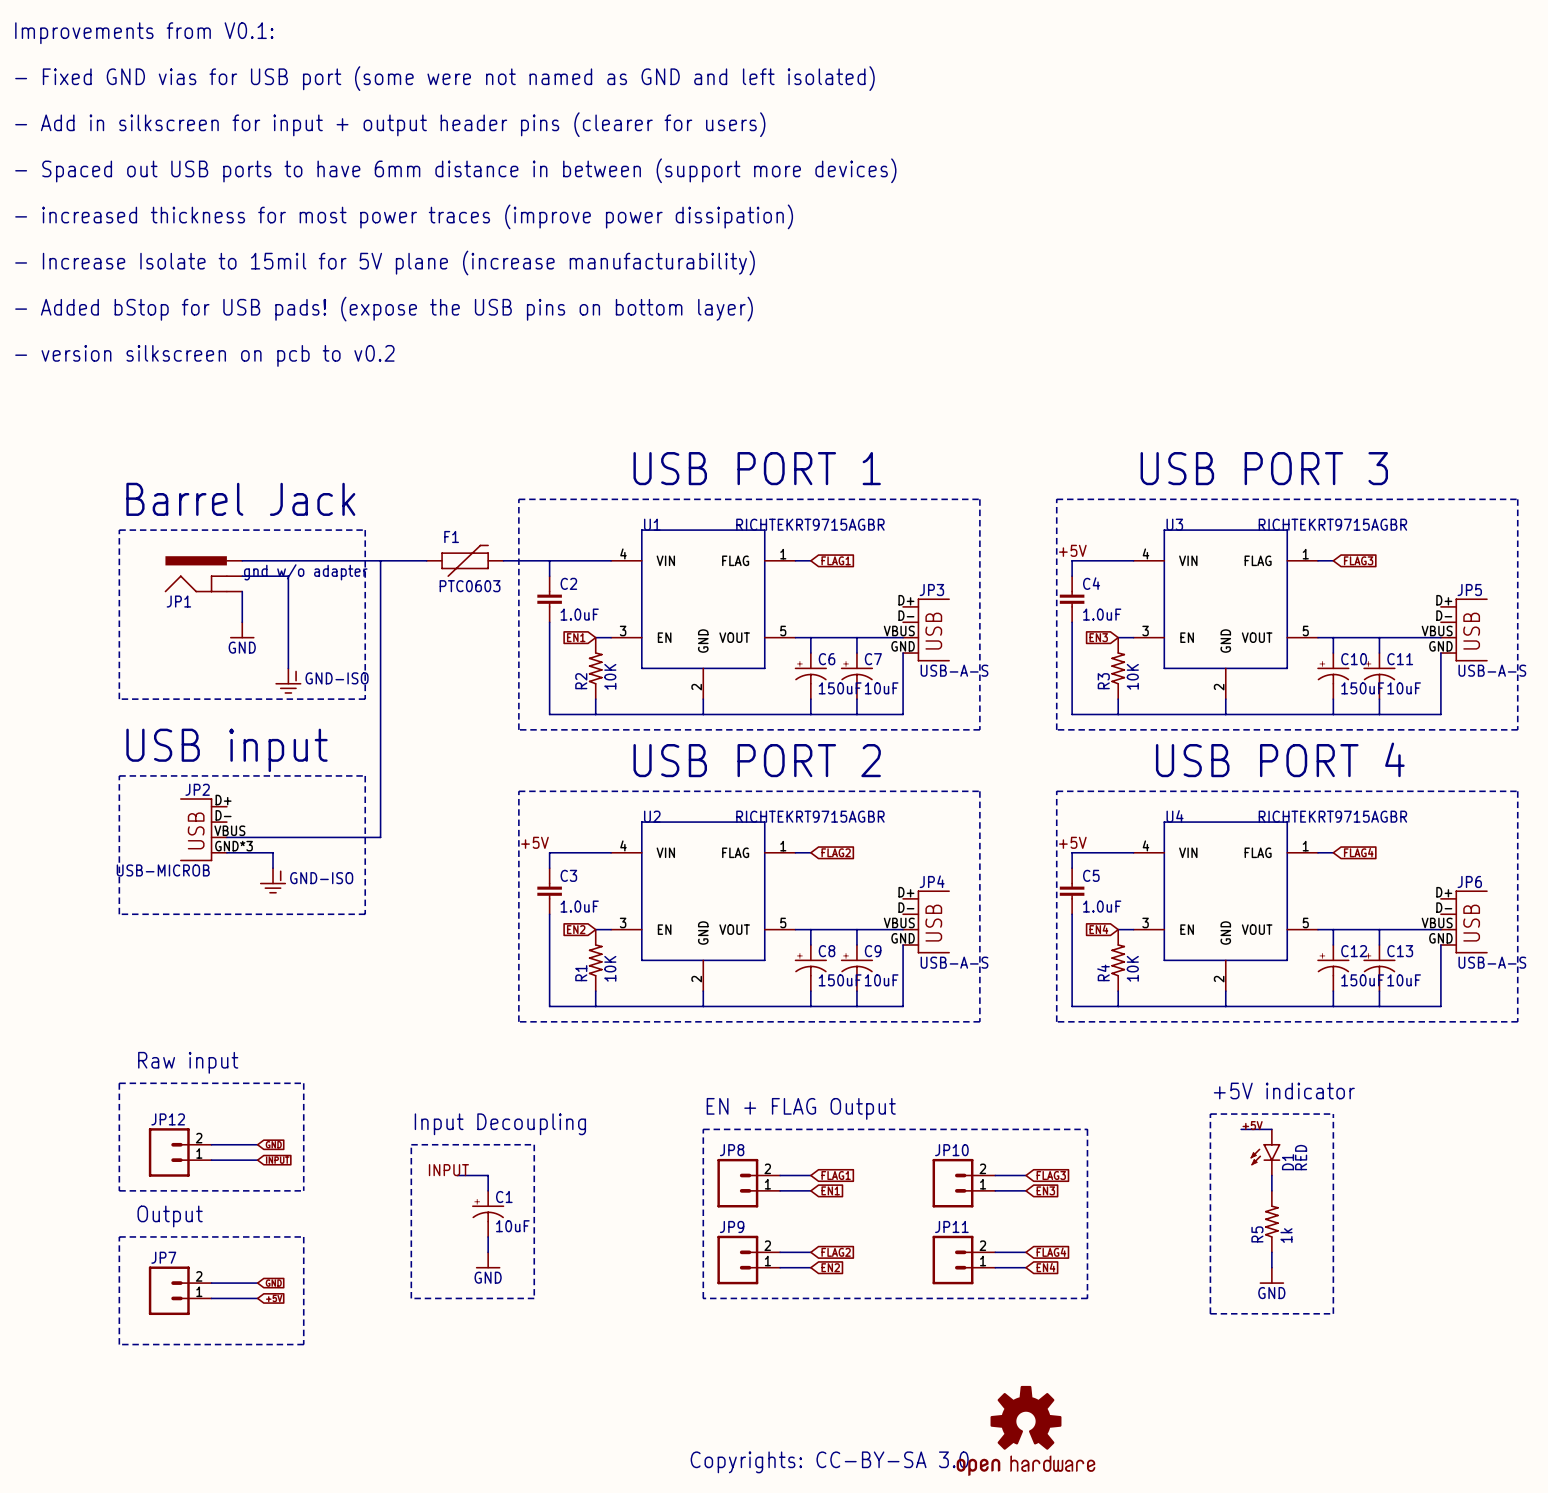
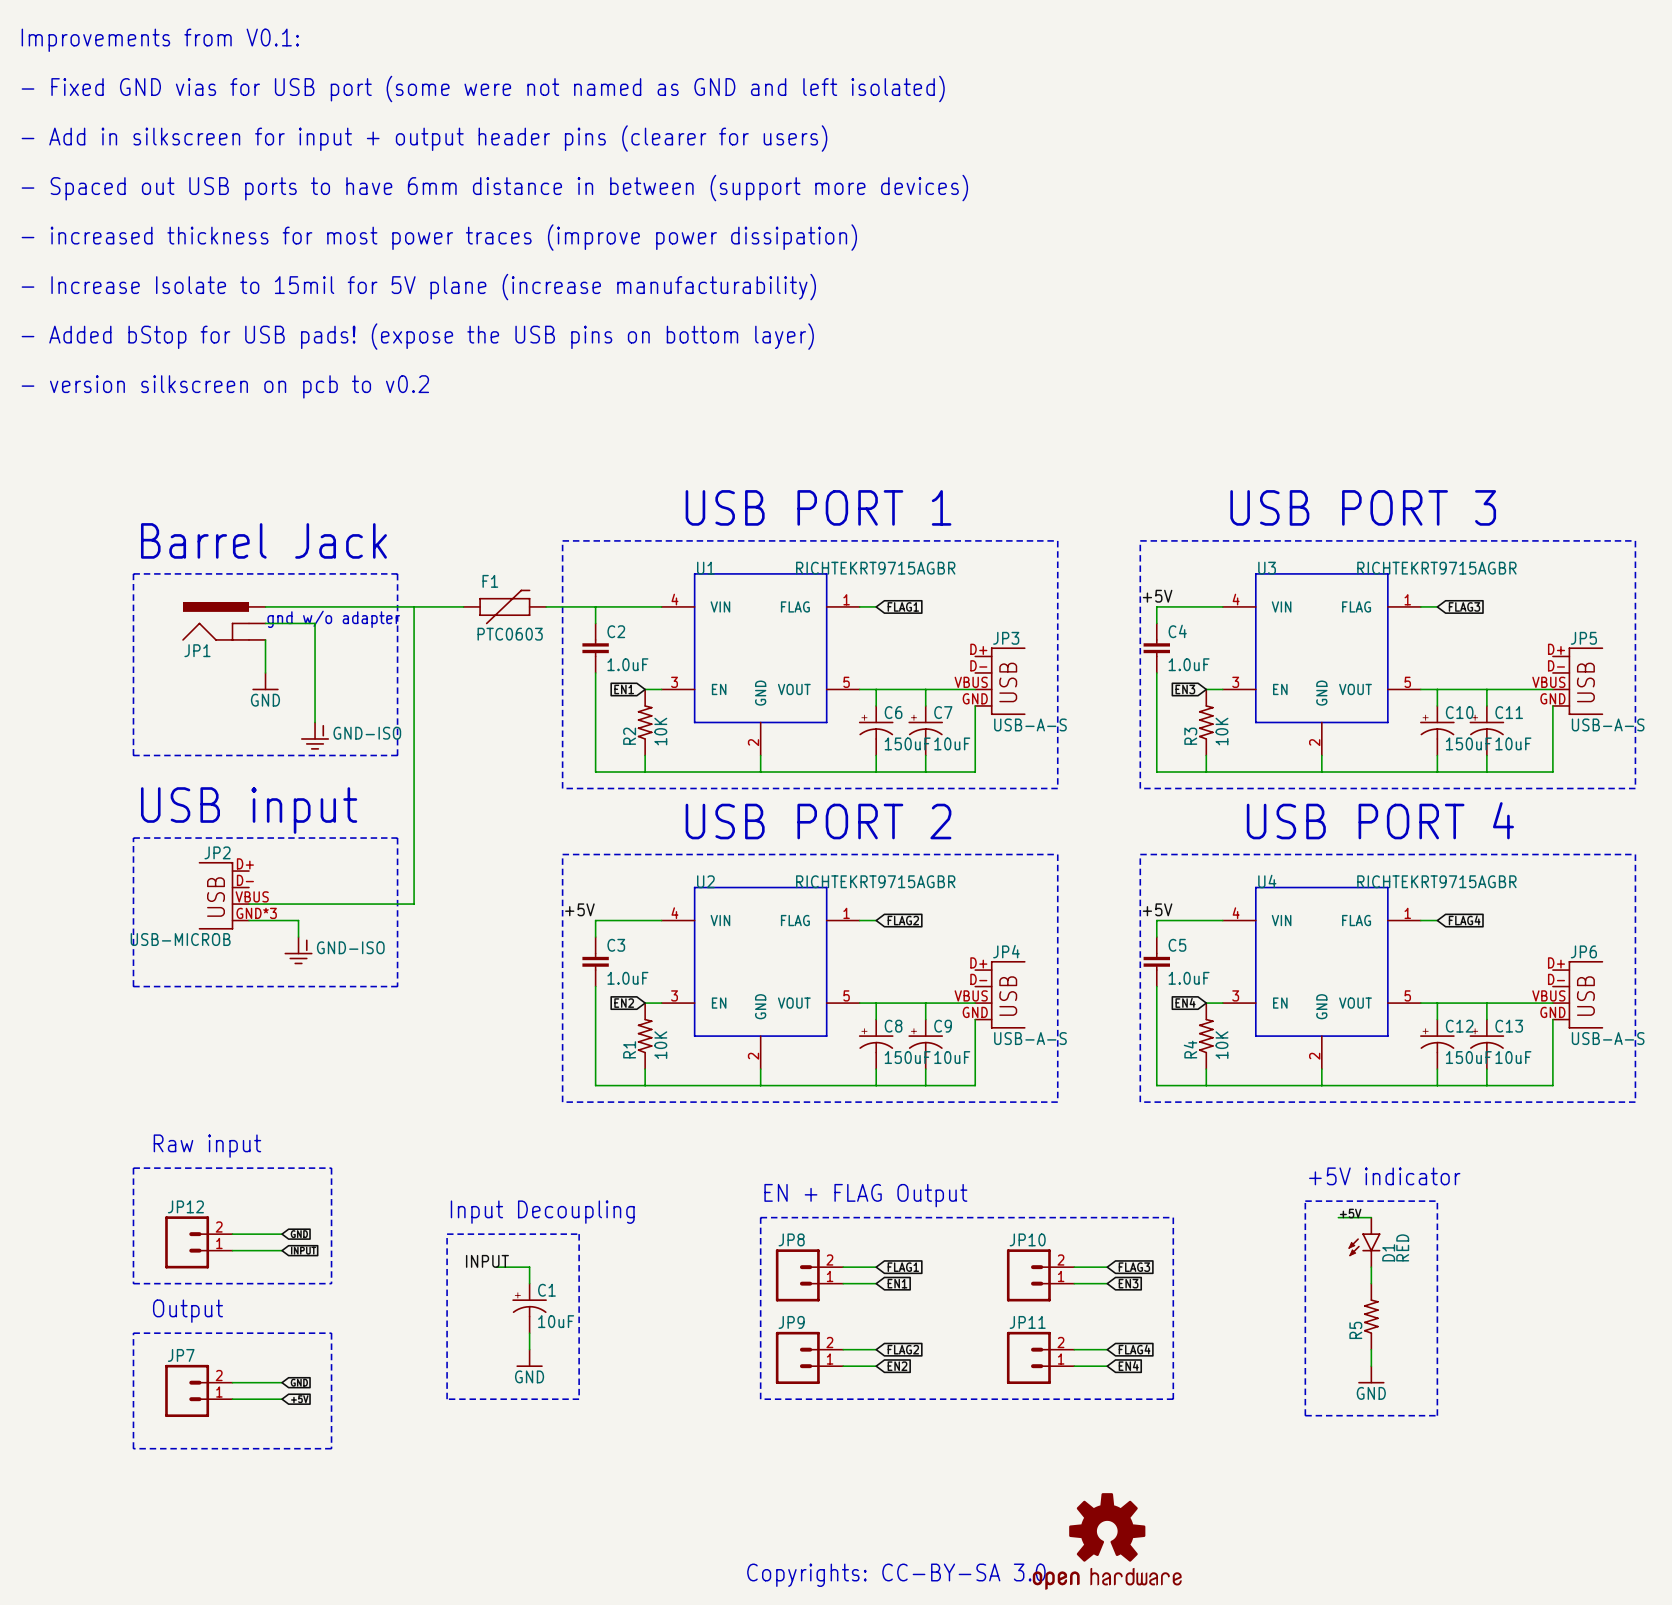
R5 value: 1k (1286, 1235) -> none

